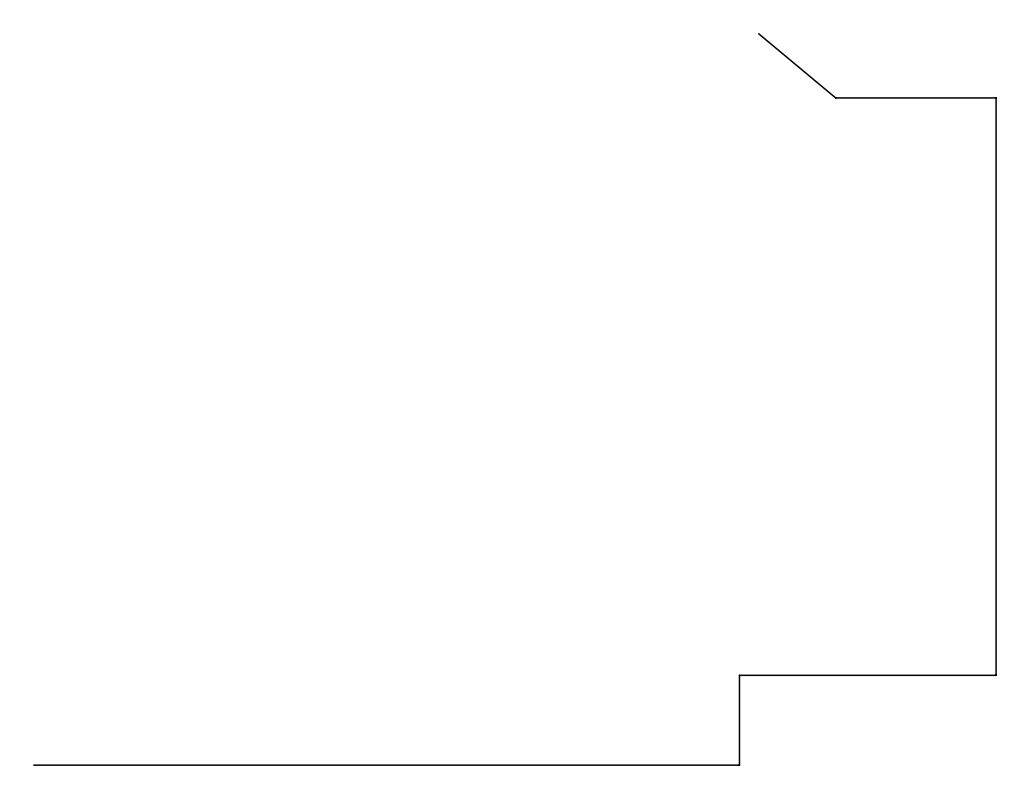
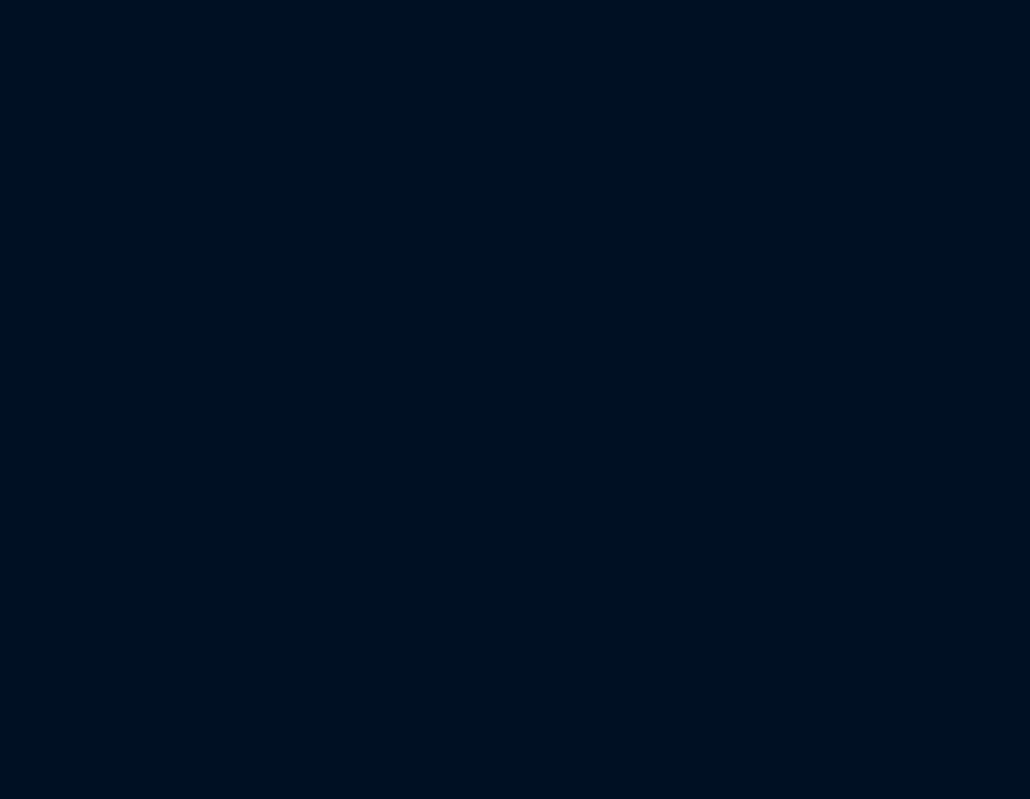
board edge: (758, 33) (835, 97) (996, 97) (996, 675) (739, 675) (739, 765) (33, 765) -> none

